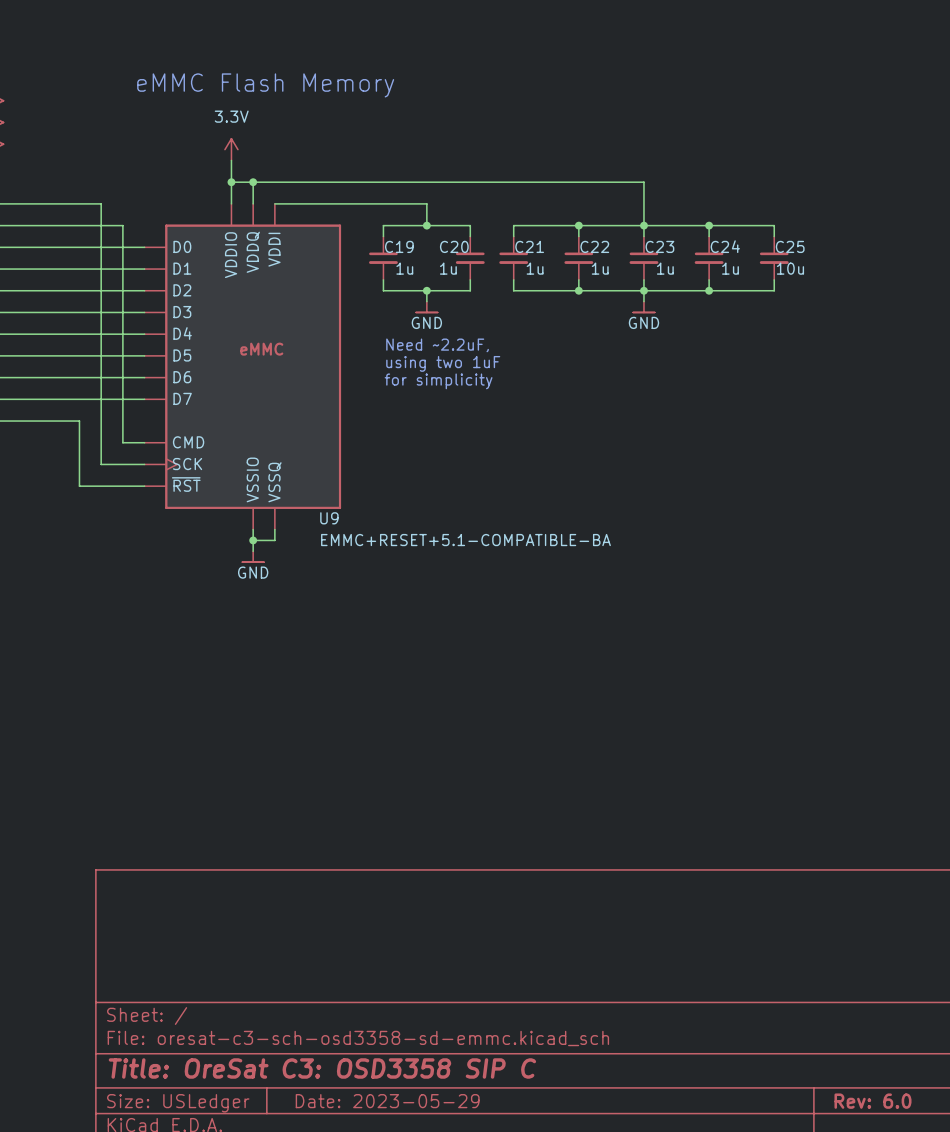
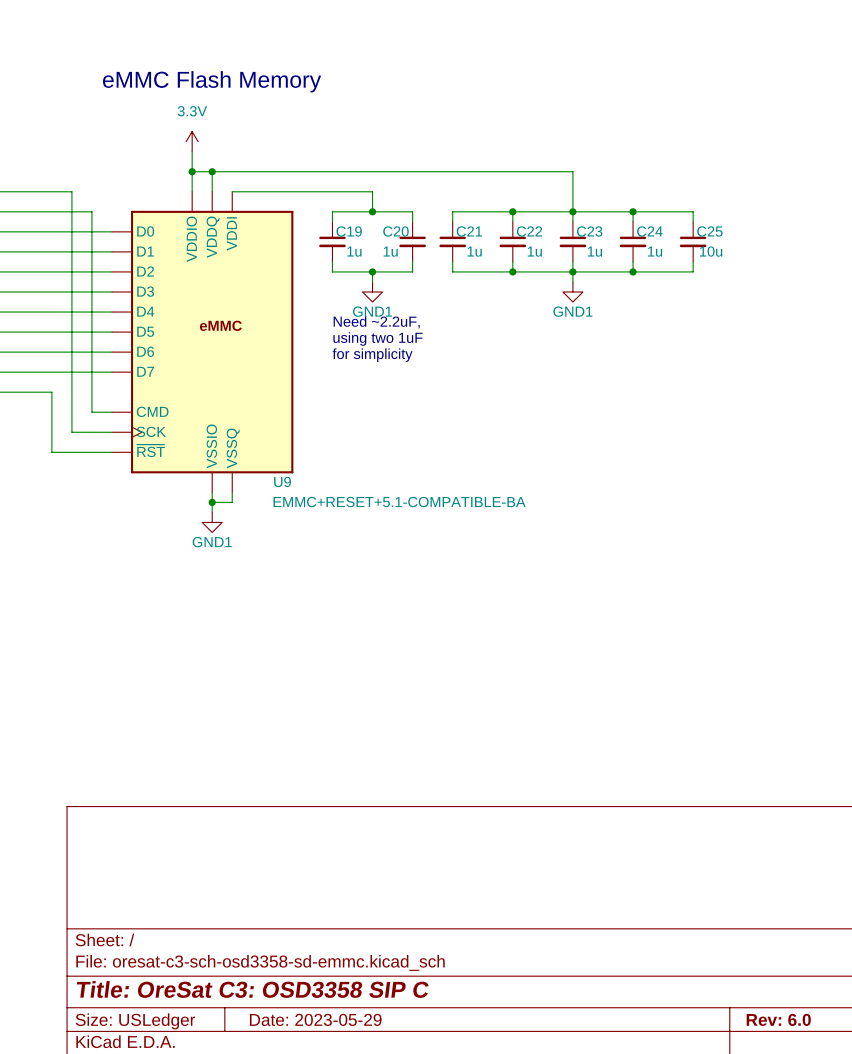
power symbol: GND (426, 307) -> GND1 (372, 291)
power symbol: GND (643, 307) -> GND1 (572, 291)
power symbol: GND (253, 556) -> GND1 (212, 522)

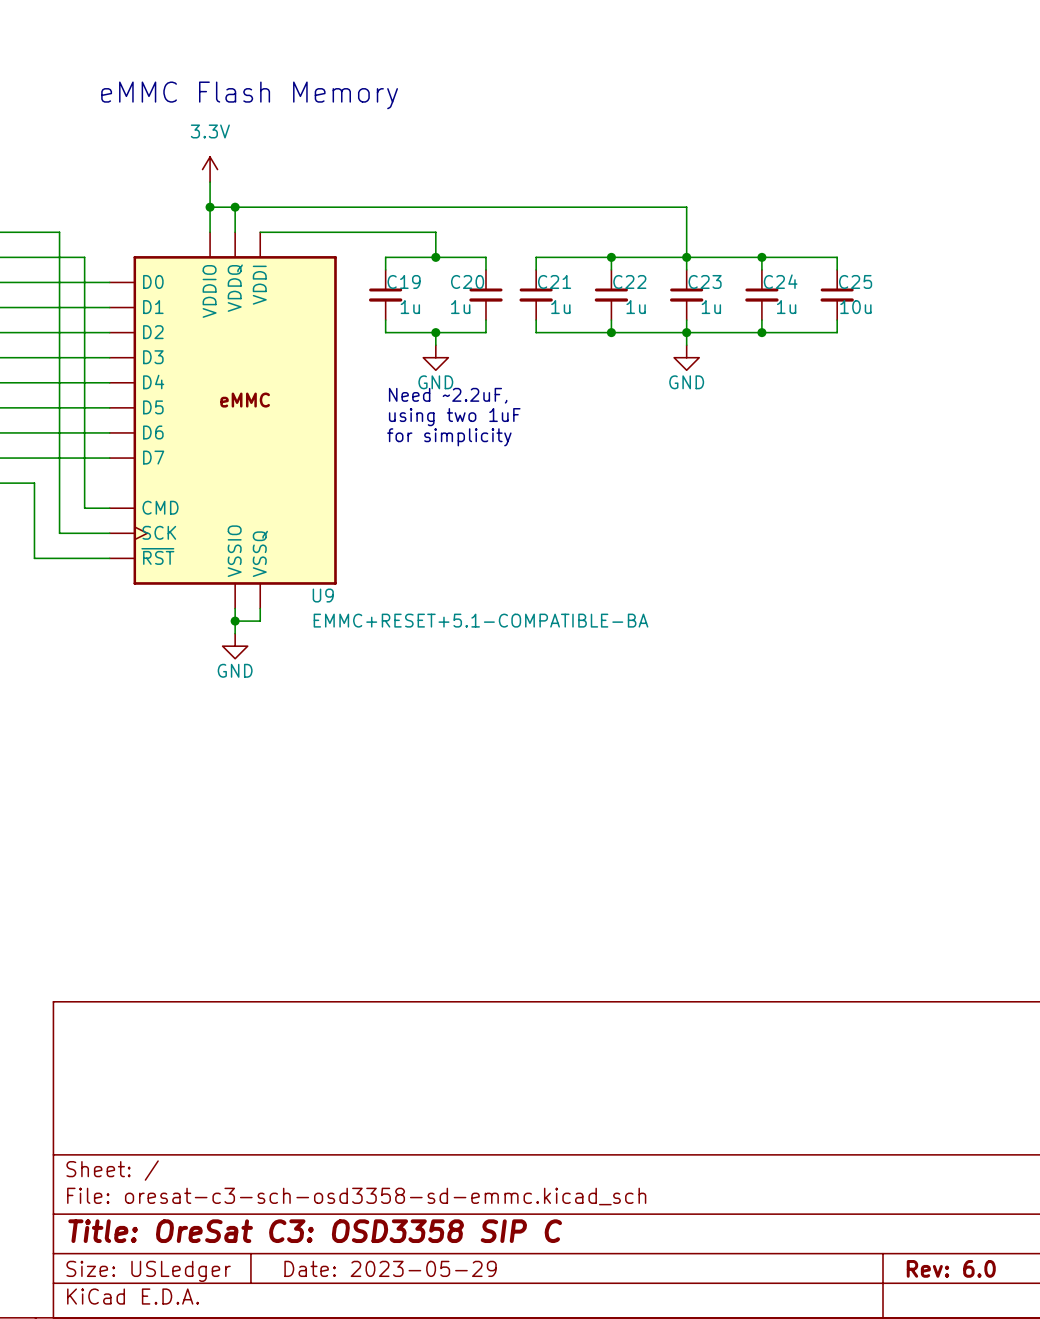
power symbol: GND1 (372, 291) -> GND (435, 357)
power symbol: GND1 (572, 291) -> GND (686, 357)
power symbol: GND1 (212, 522) -> GND (235, 646)

